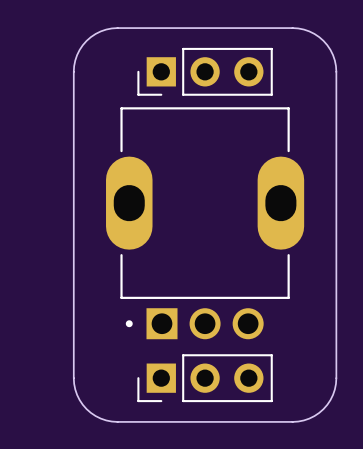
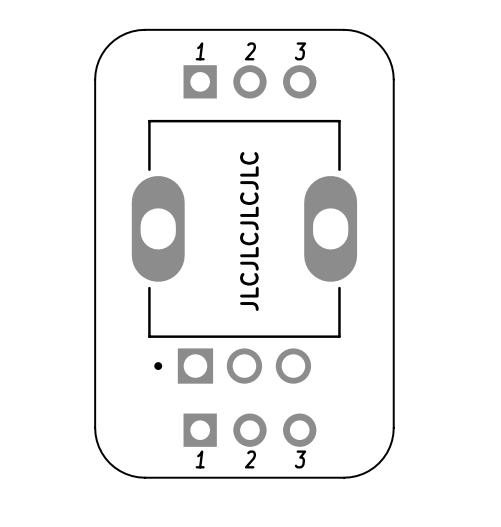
text: none -> 2 (250, 51)
part footprint: [137, 47, 273, 96] -> [183, 65, 317, 99]
text: none -> 1 (200, 51)
text: none -> 3 (300, 51)
text: none -> JLCJLCJLCJLC (249, 231)
part footprint: [137, 354, 273, 403] -> [183, 413, 317, 447]
text: none -> 1 (200, 459)
text: none -> 2 (250, 459)
text: none -> 3 (300, 459)

